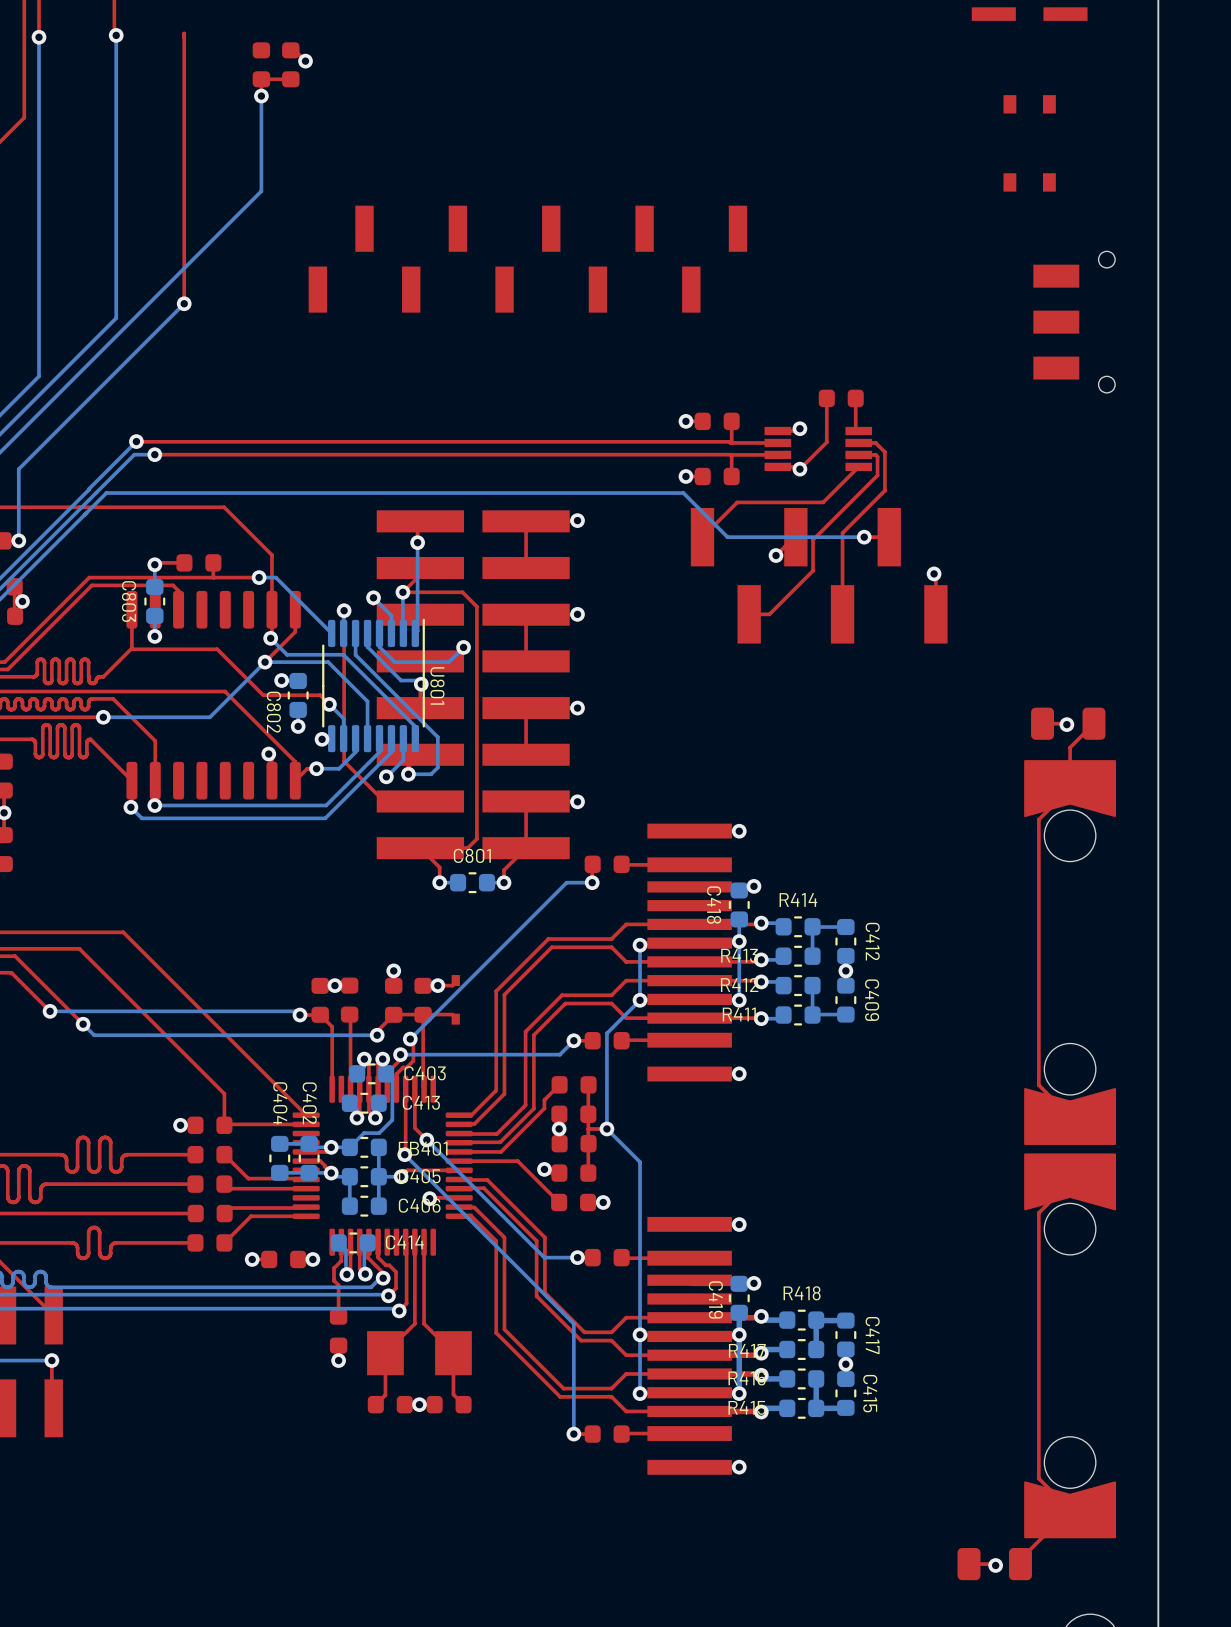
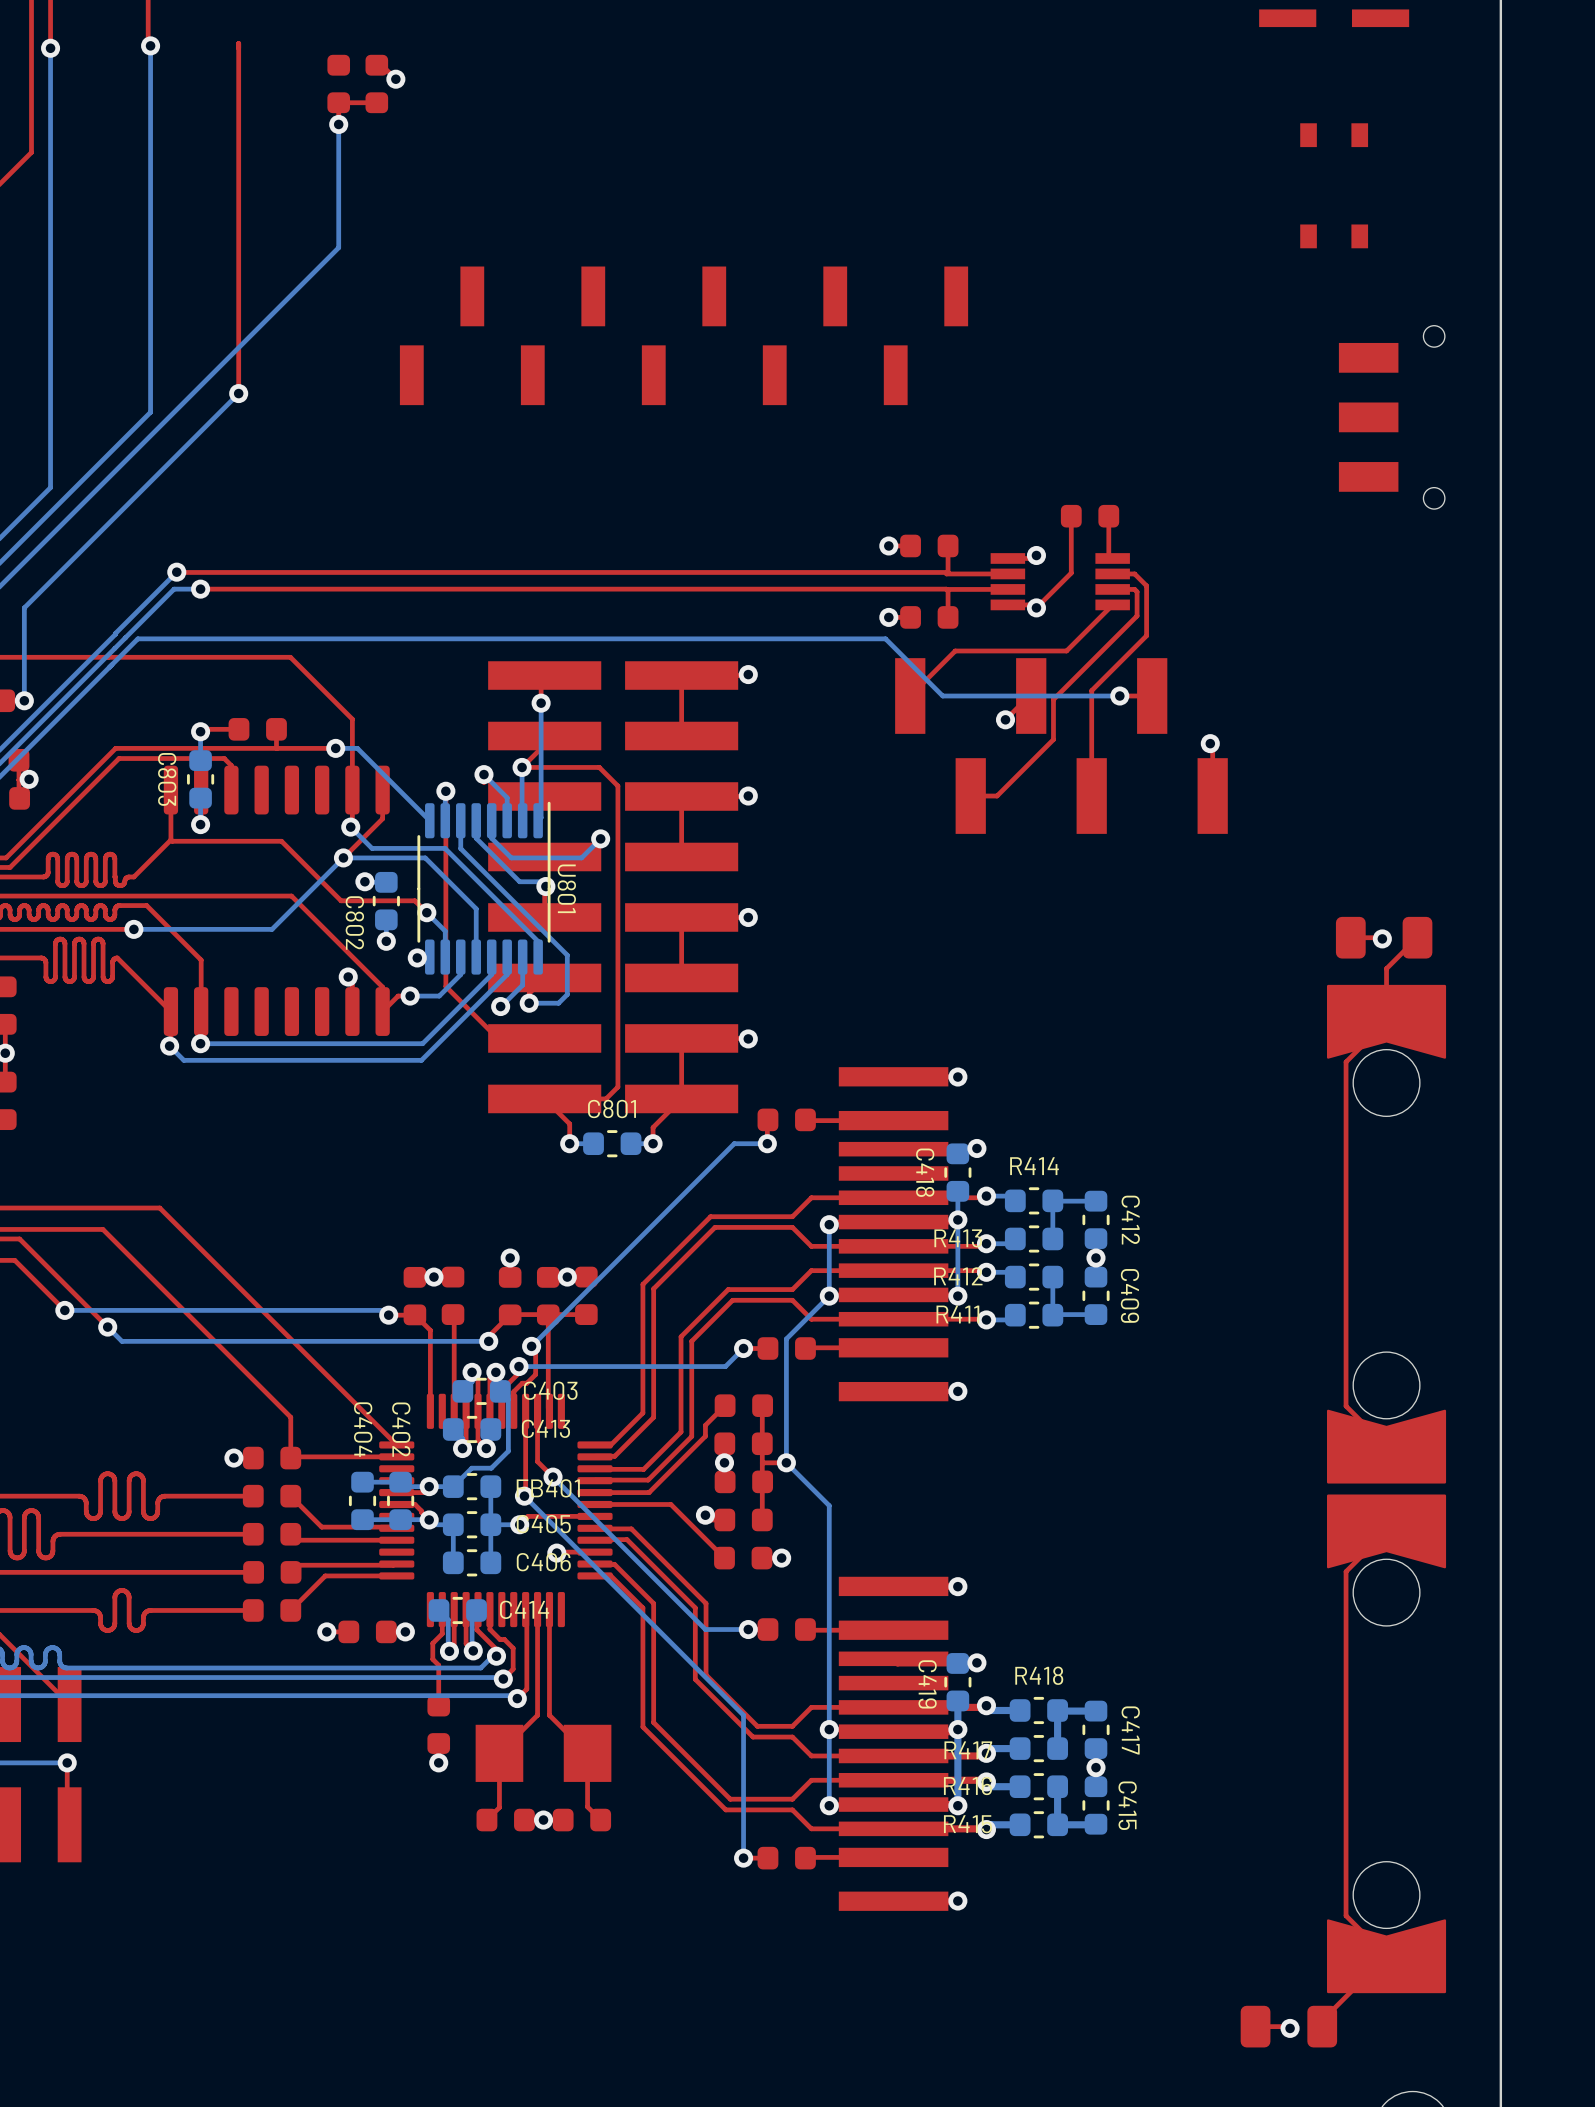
part footprint: [451, 975, 460, 1025] -> [575, 1266, 598, 1325]

